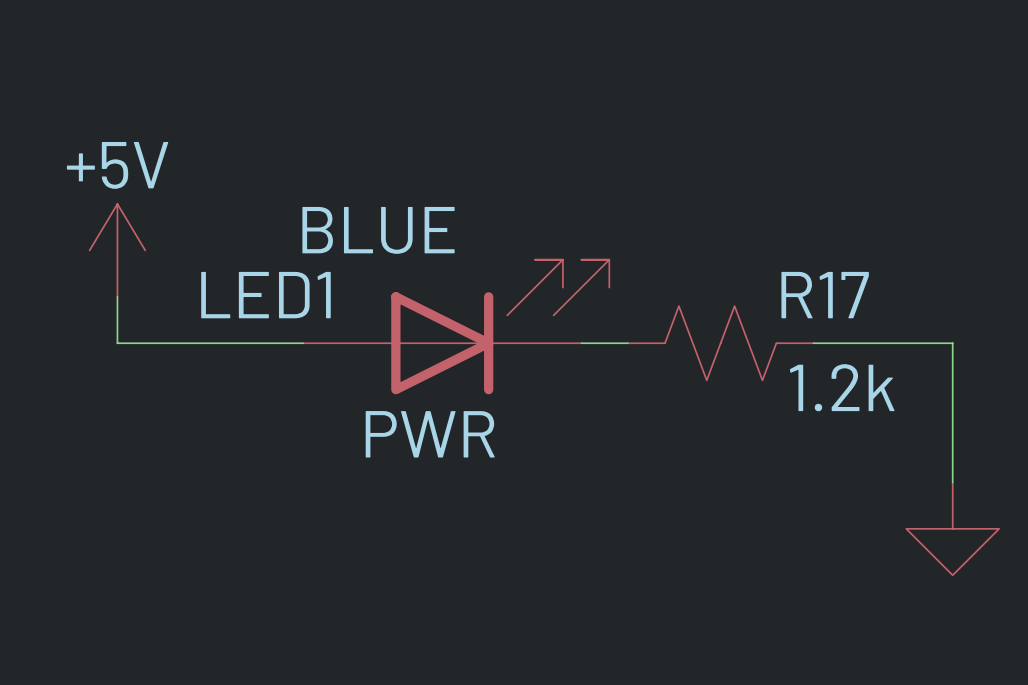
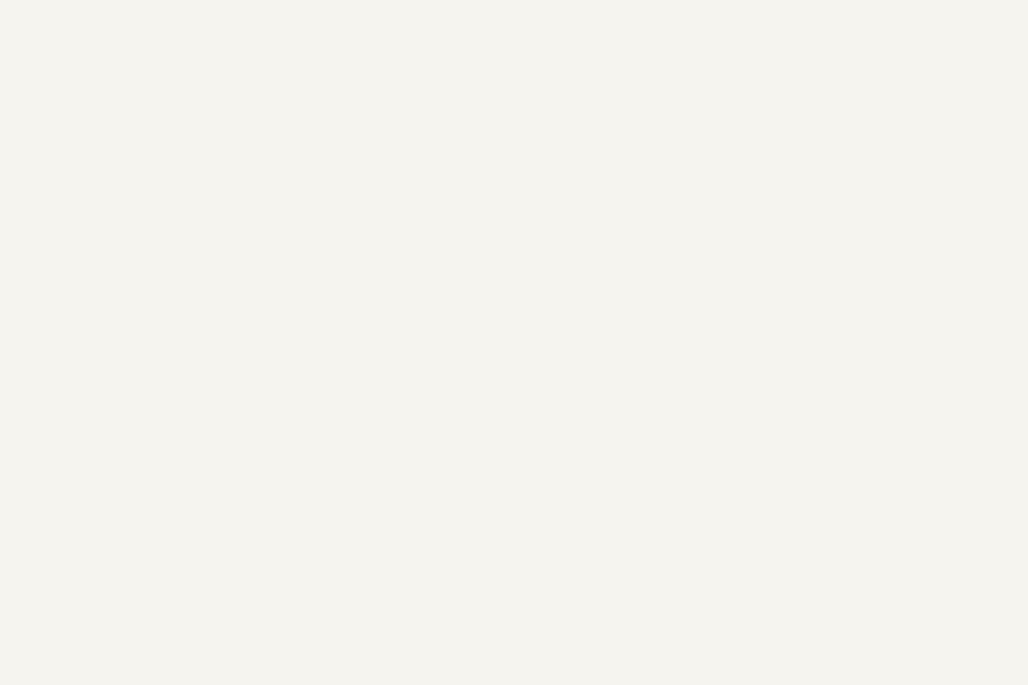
power symbol: +5V (117, 250) -> none
wire: (117, 296) (117, 343) (303, 343) -> none
LED1: (456, 326) -> none
wire: (581, 343) (627, 343) -> none
R17: 1.2k (720, 343) -> none
wire: (813, 343) (952, 343) (952, 482) -> none
power symbol: (952, 528) -> none

